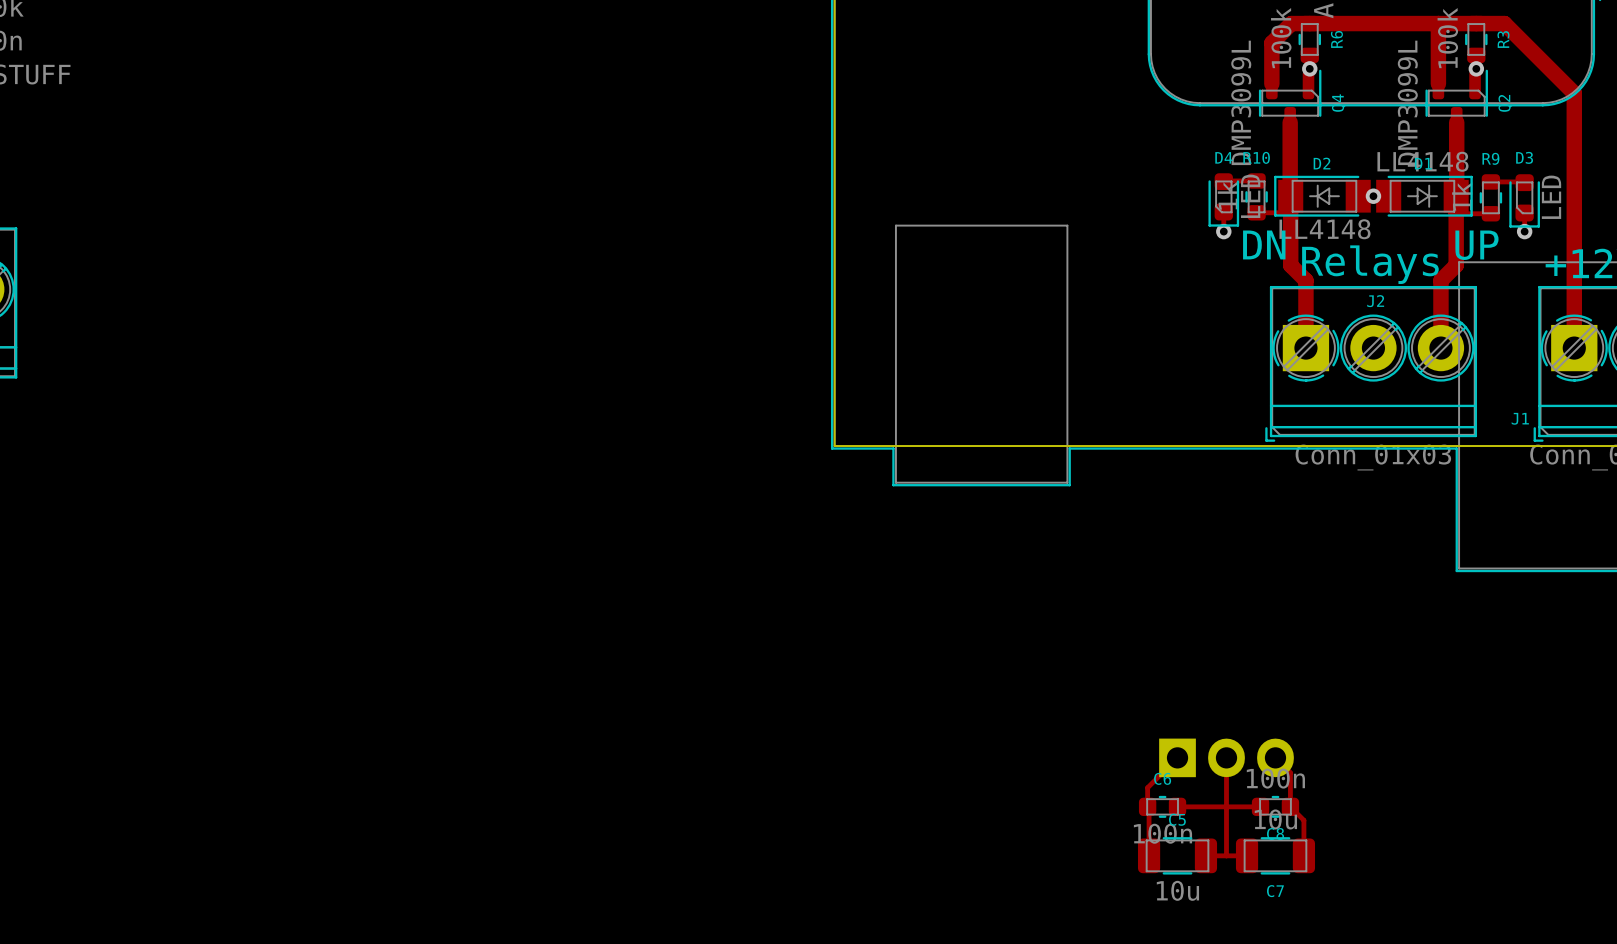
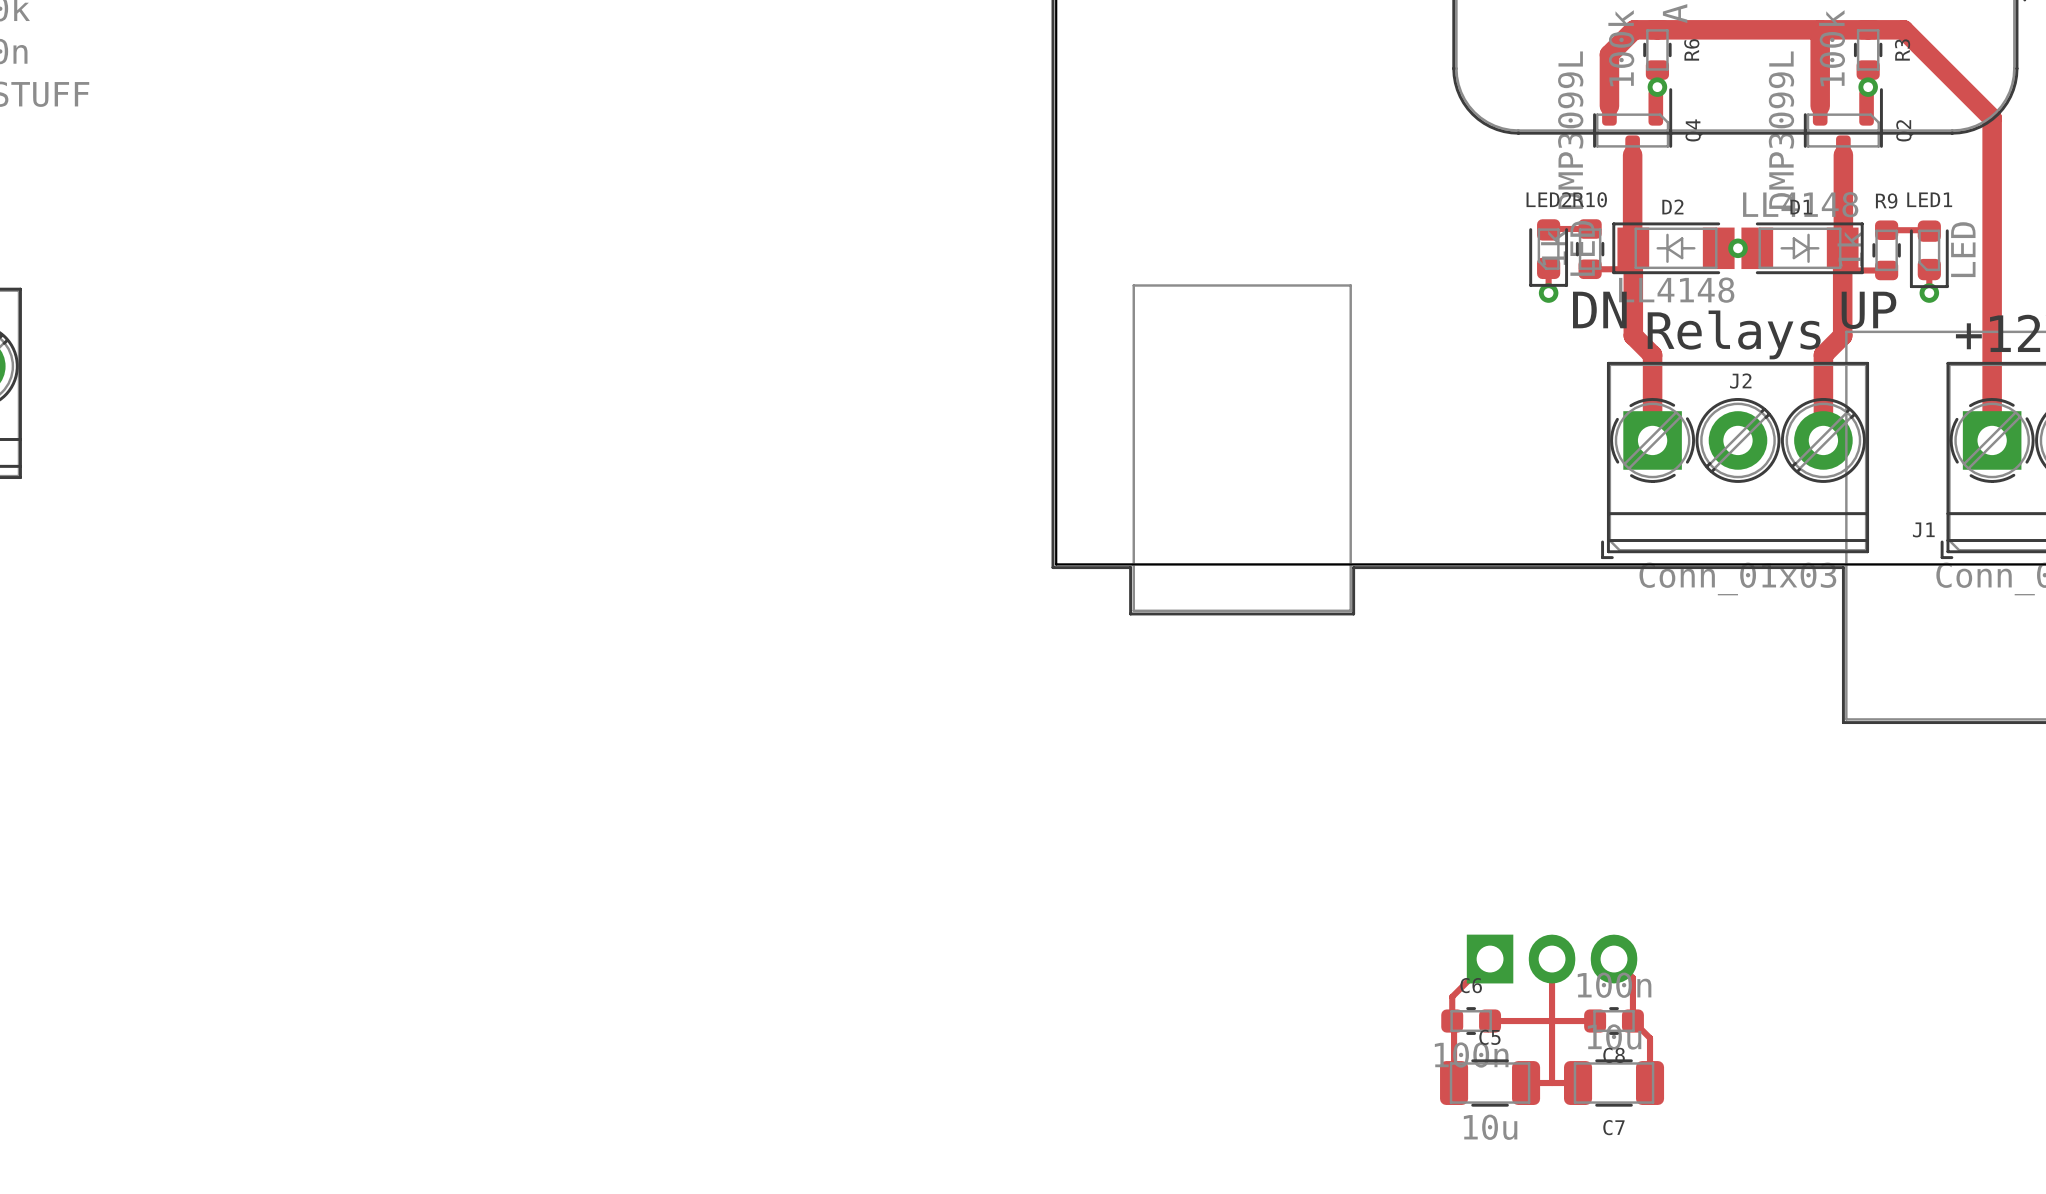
D4 name: D4 (1223, 157) -> LED2 (1548, 199)
D3 name: D3 (1524, 157) -> LED1 (1929, 199)

